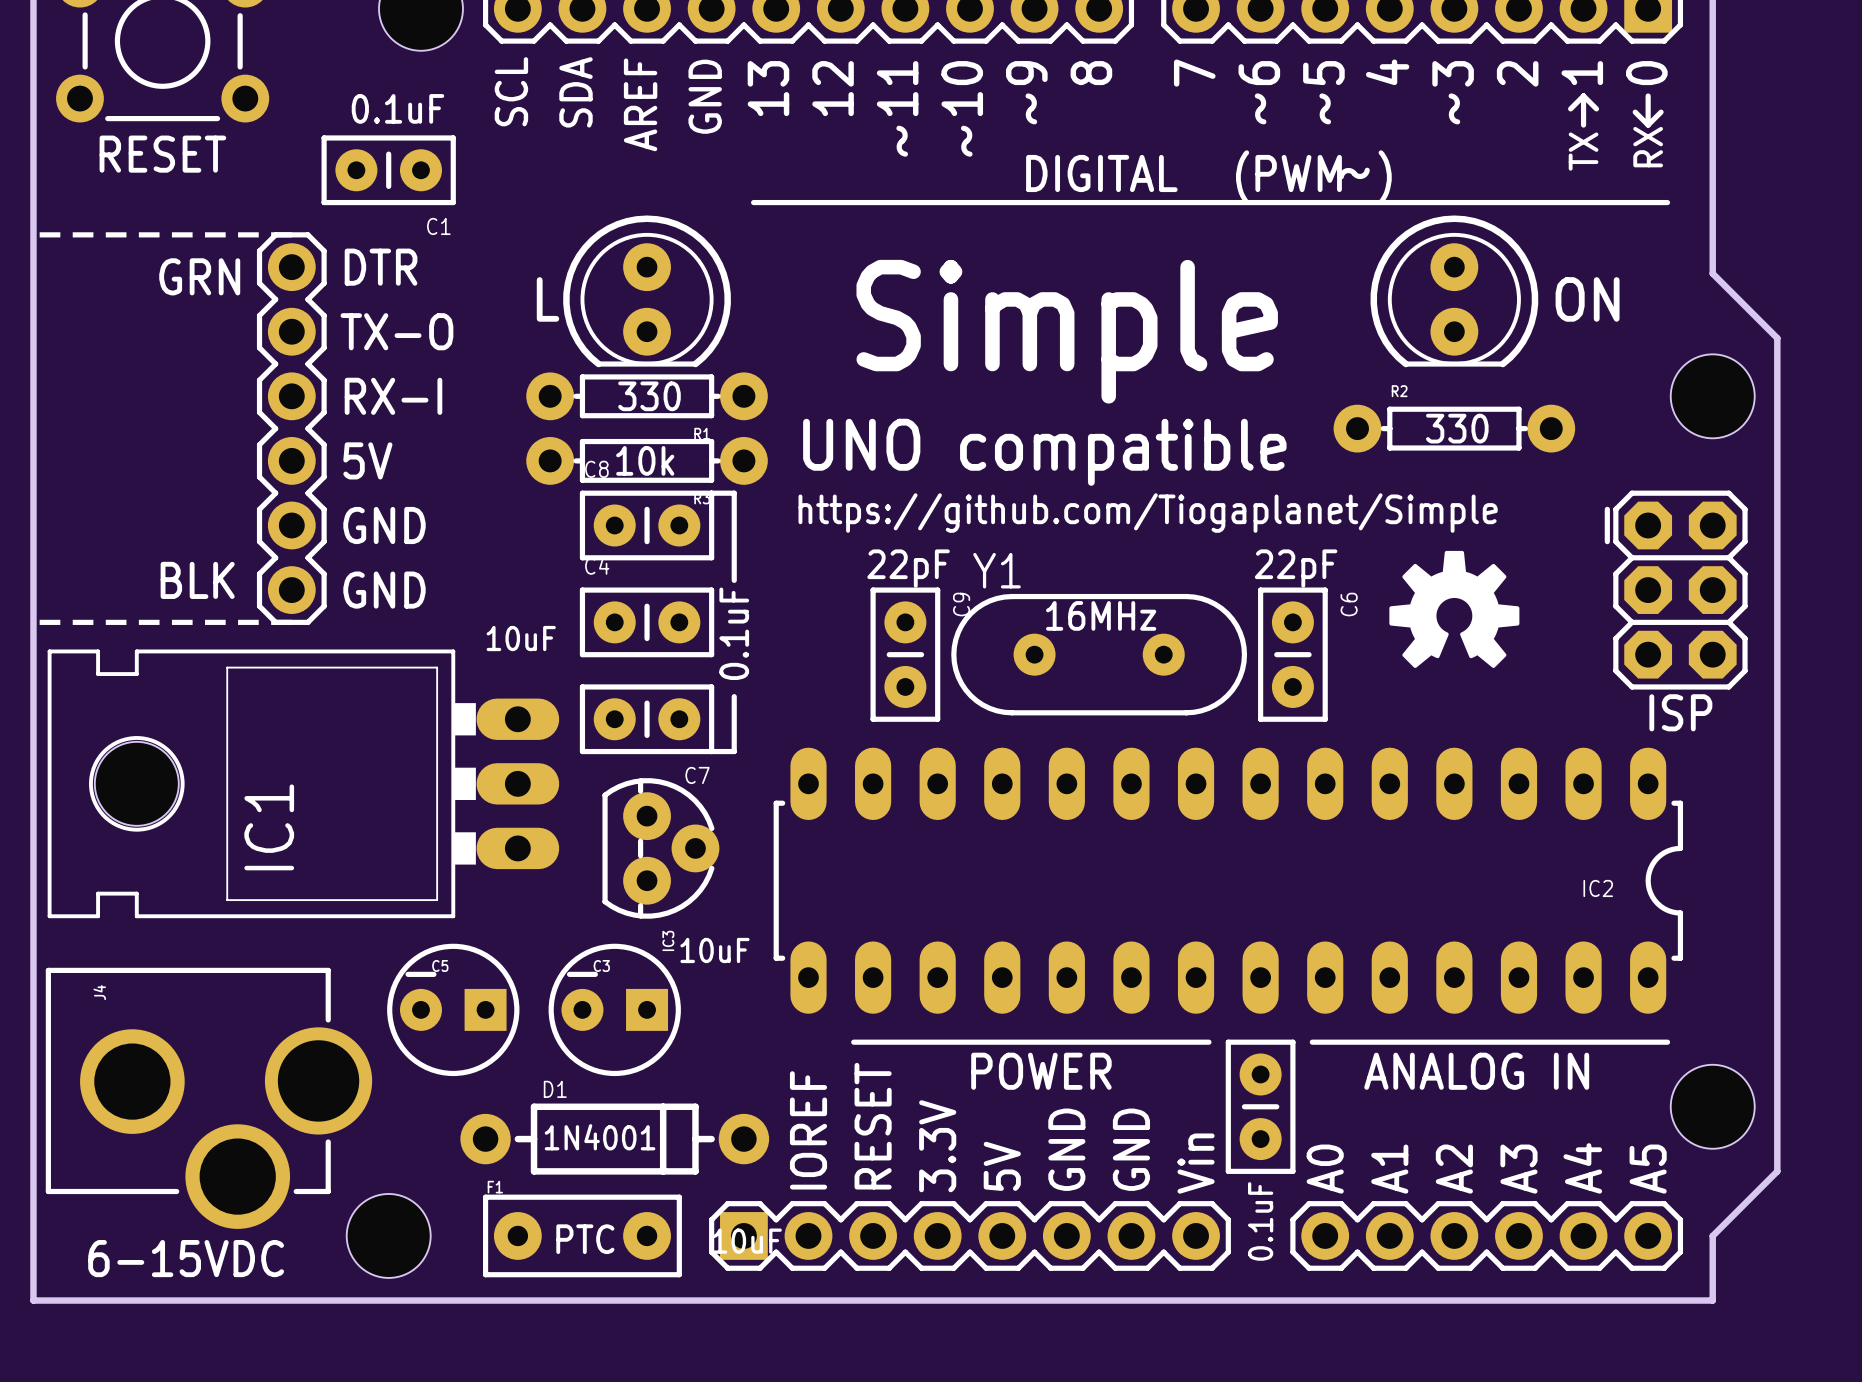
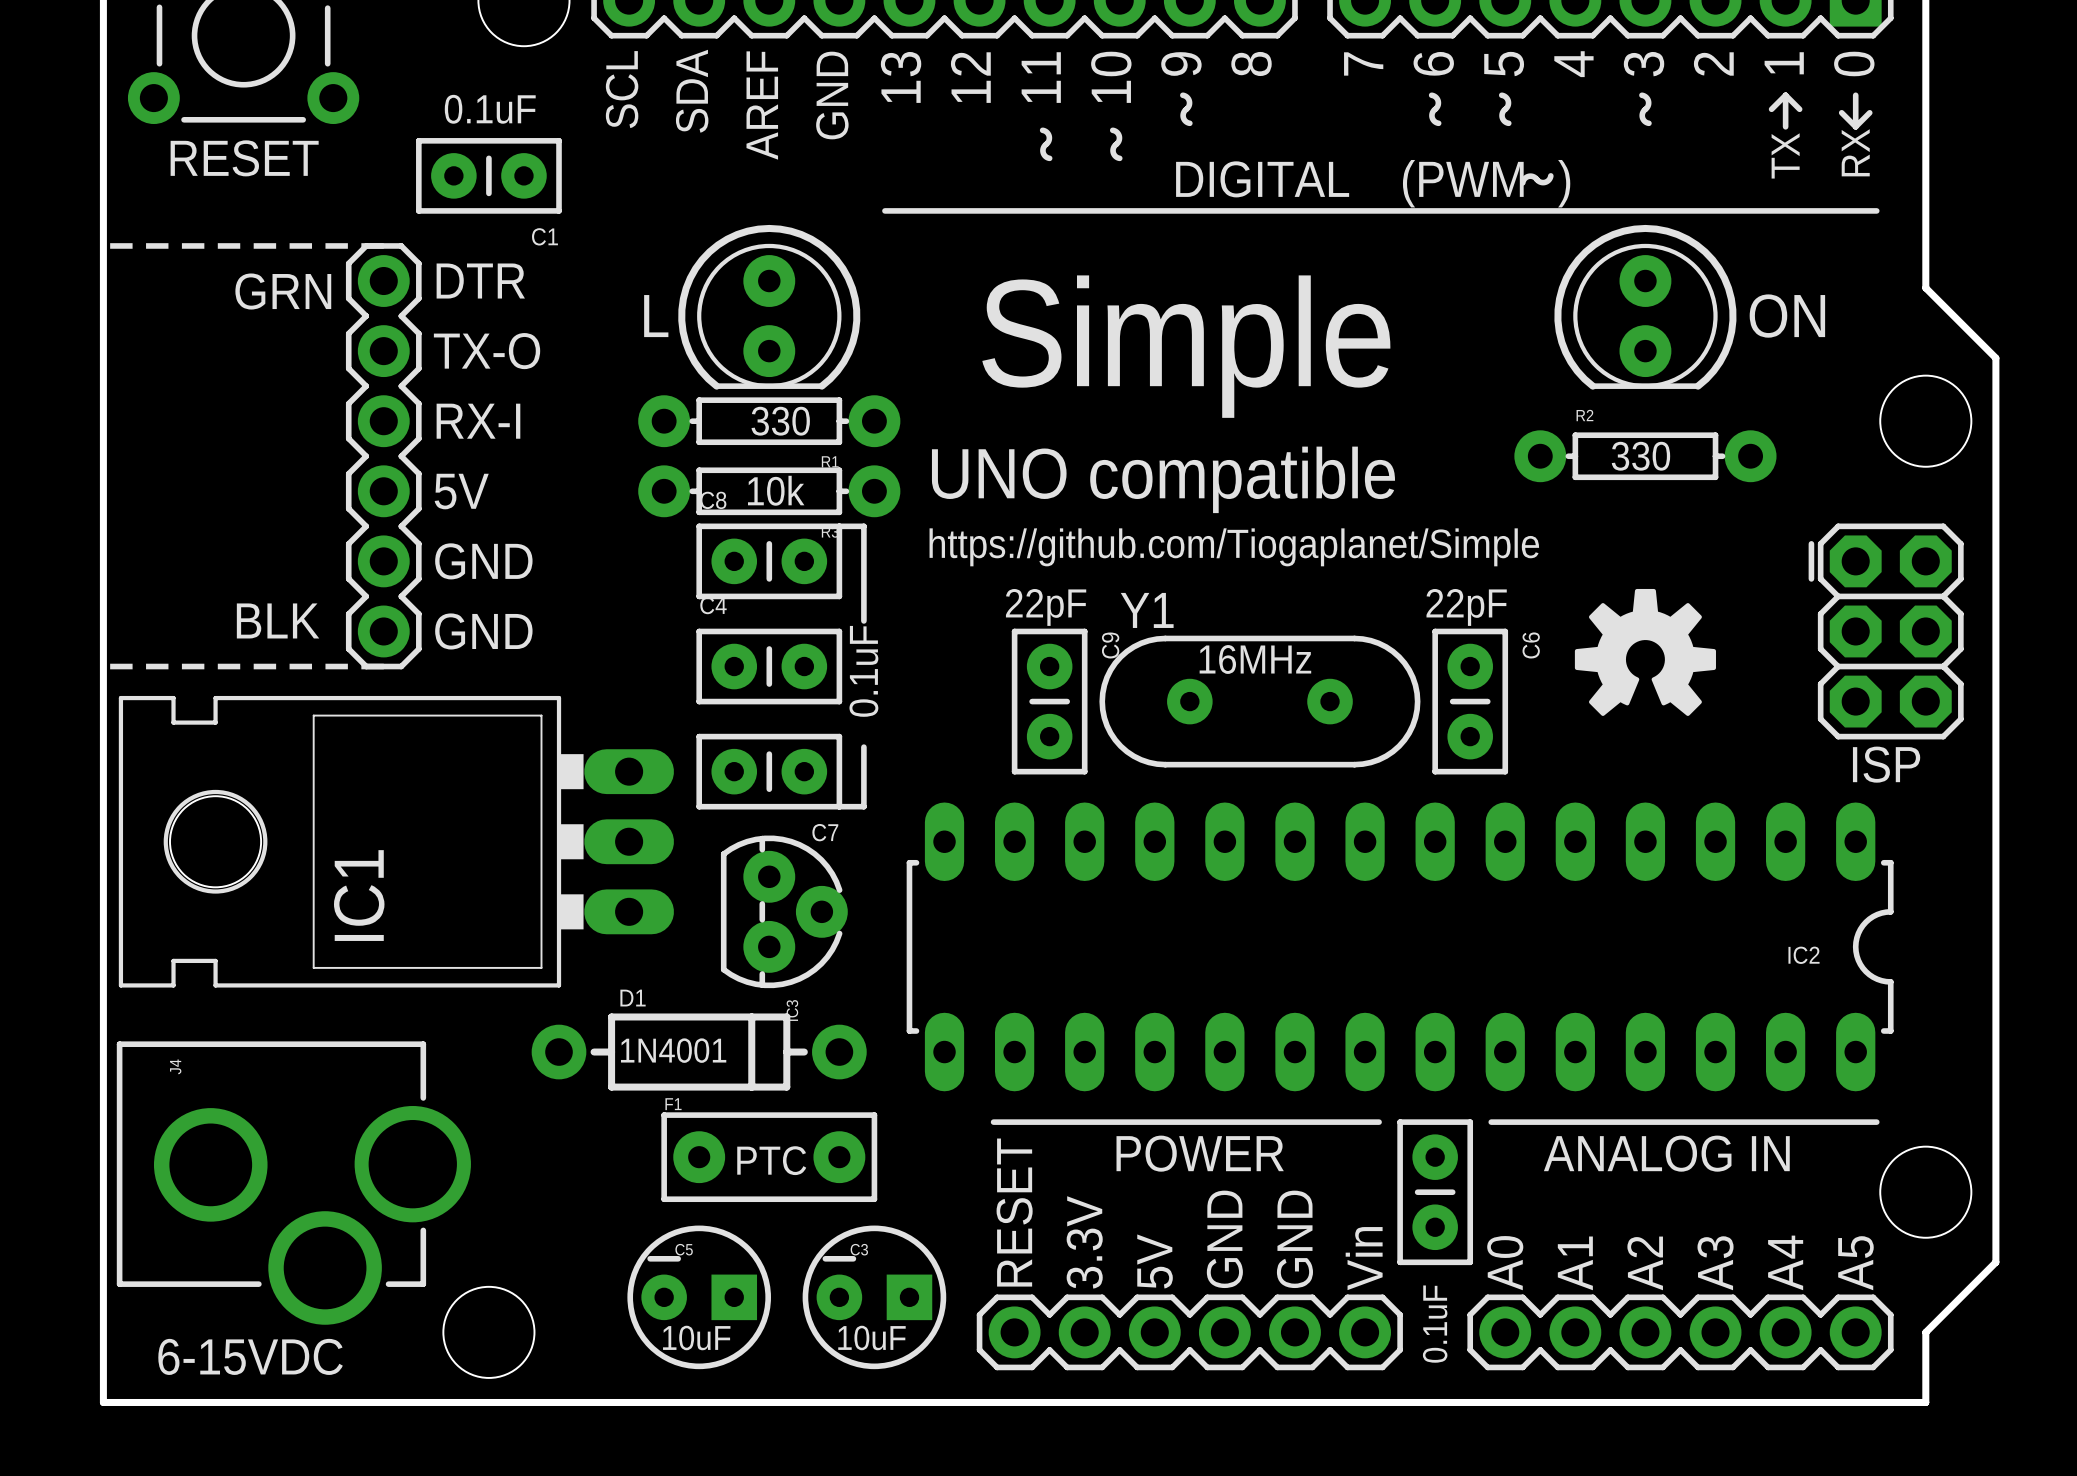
text: 10uF (521, 638) -> none
text: 10uF (714, 950) -> none
C5 position: (453, 1009) -> (699, 1297)
C3 position: (614, 1009) -> (874, 1297)
text: none -> PTC (771, 1160)
text: IOREF (808, 1130) -> none
text position: 1N4001 (600, 1137) -> 1N4001 (673, 1050)
D1 position: (614, 1139) -> (699, 1052)
F1 position: (582, 1235) -> (769, 1157)
part: (969, 1235) -> none
part: none -> (1189, 1332)
text: PTC (585, 1239) -> 10uF (696, 1337)

